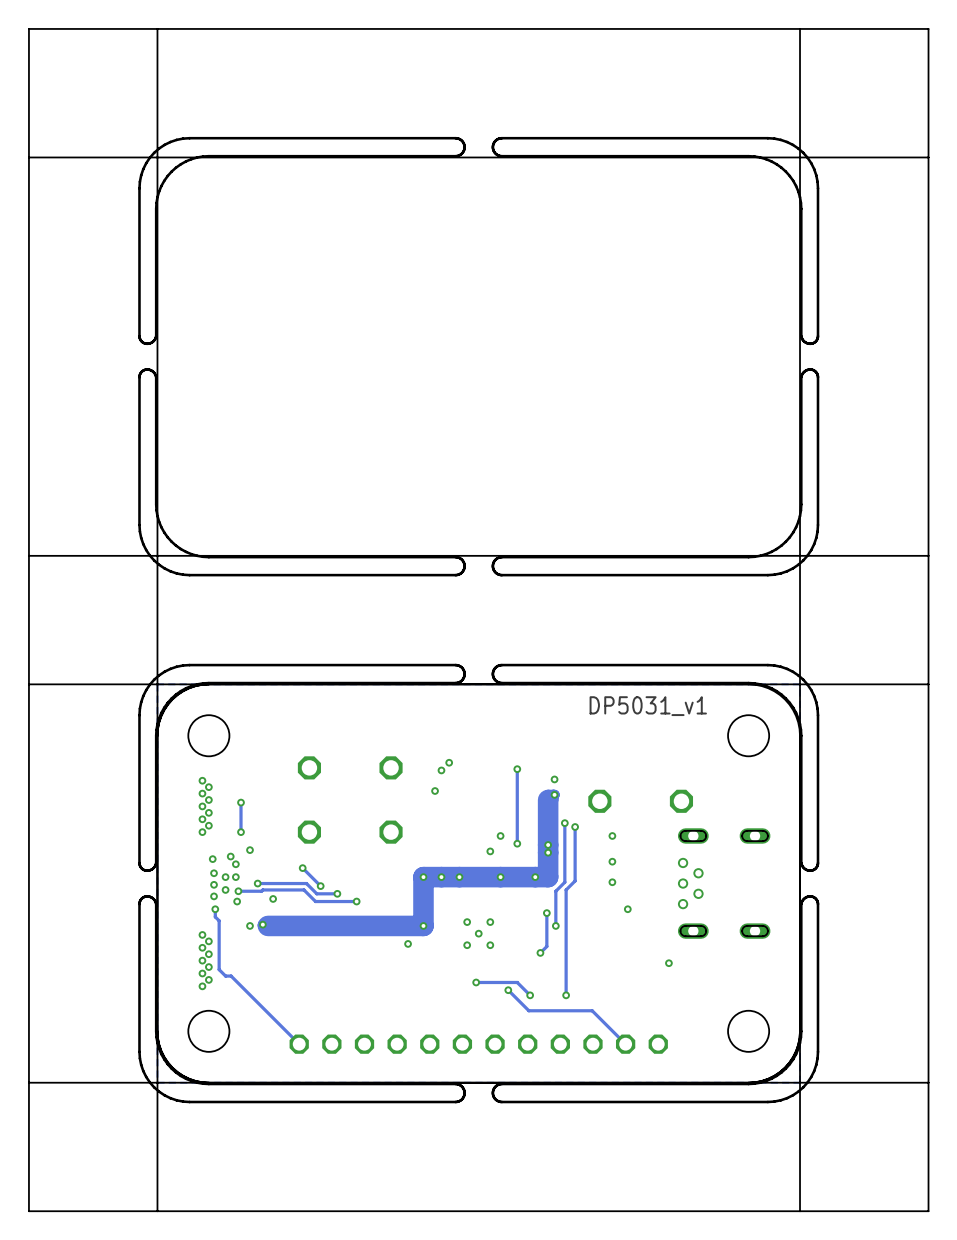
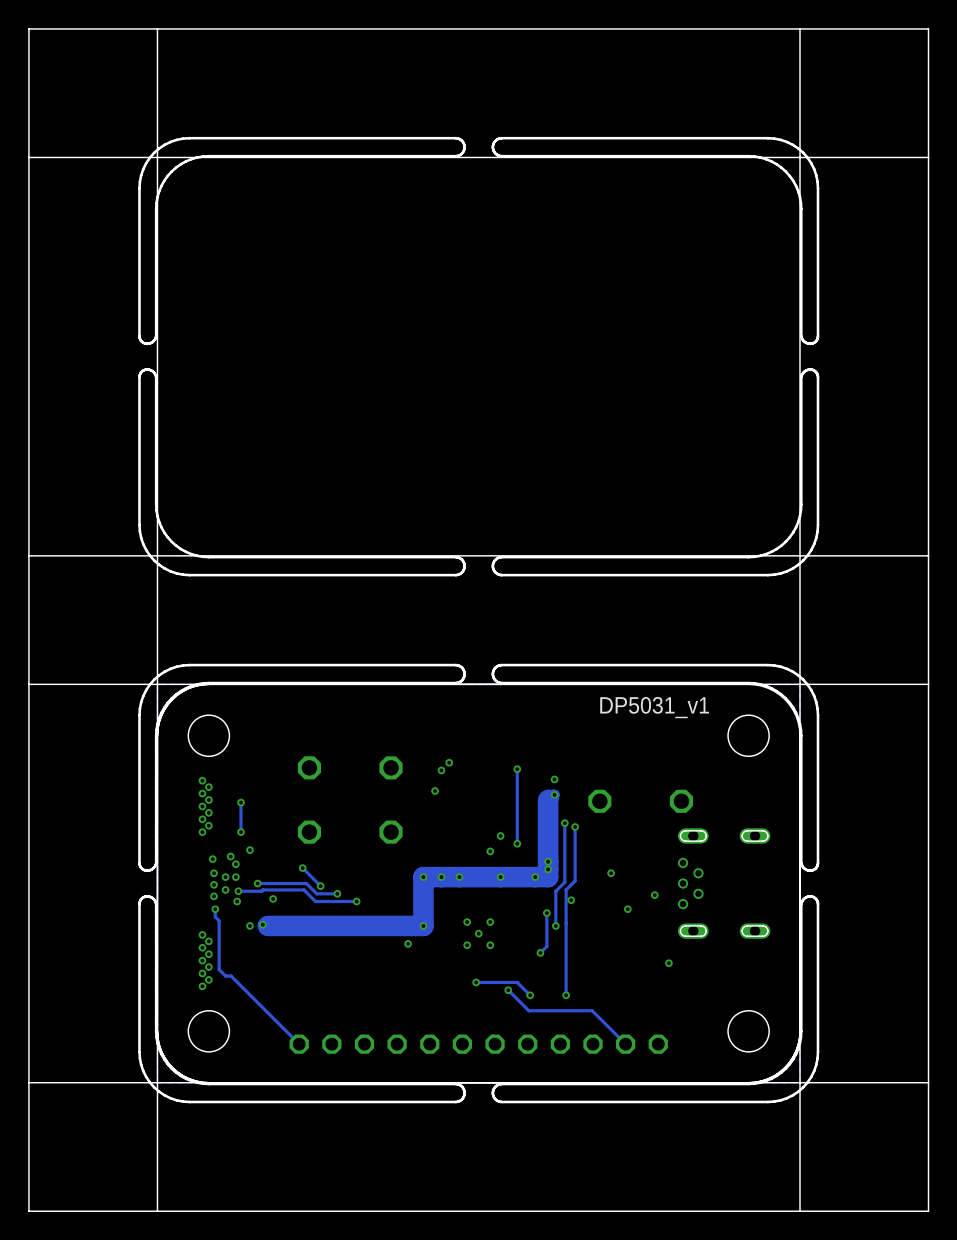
via: (612, 835) -> none
via: (548, 844) -> none
via: (548, 852) -> none
via: none -> (548, 861)
via: (612, 861) -> none
via: none -> (548, 869)
via: none -> (611, 873)
via: (612, 882) -> none
via: none -> (654, 895)
via: none -> (571, 900)

